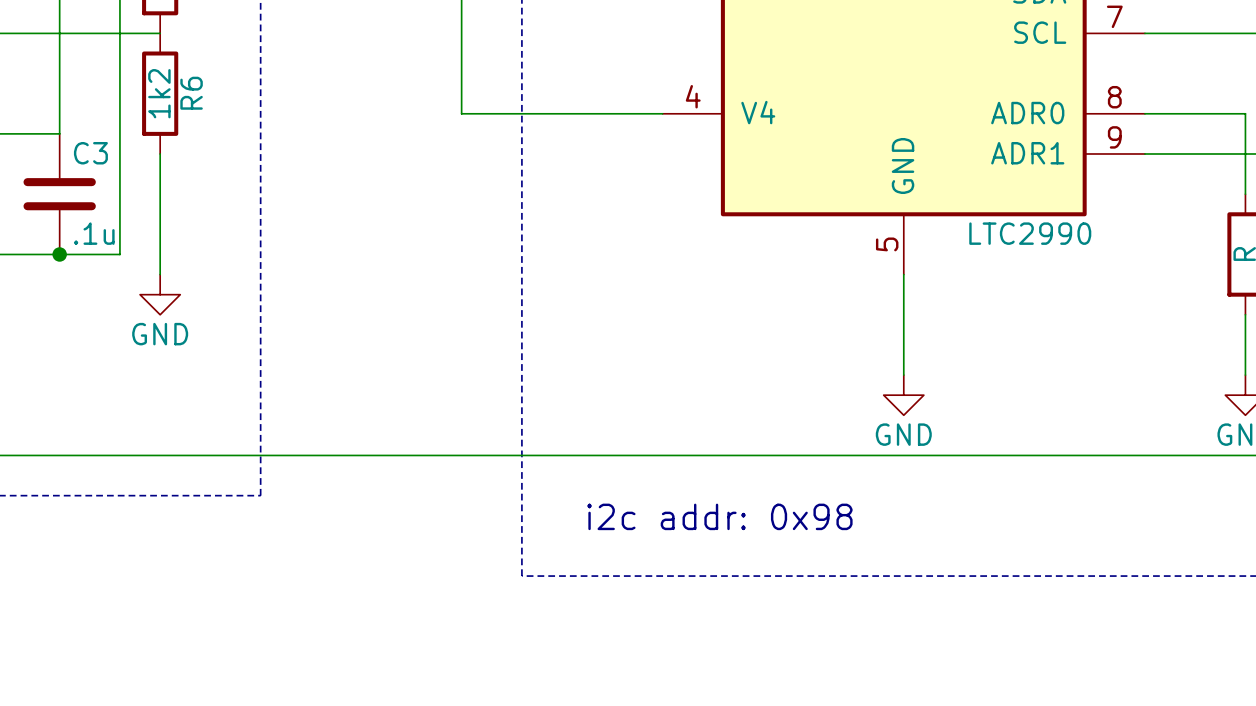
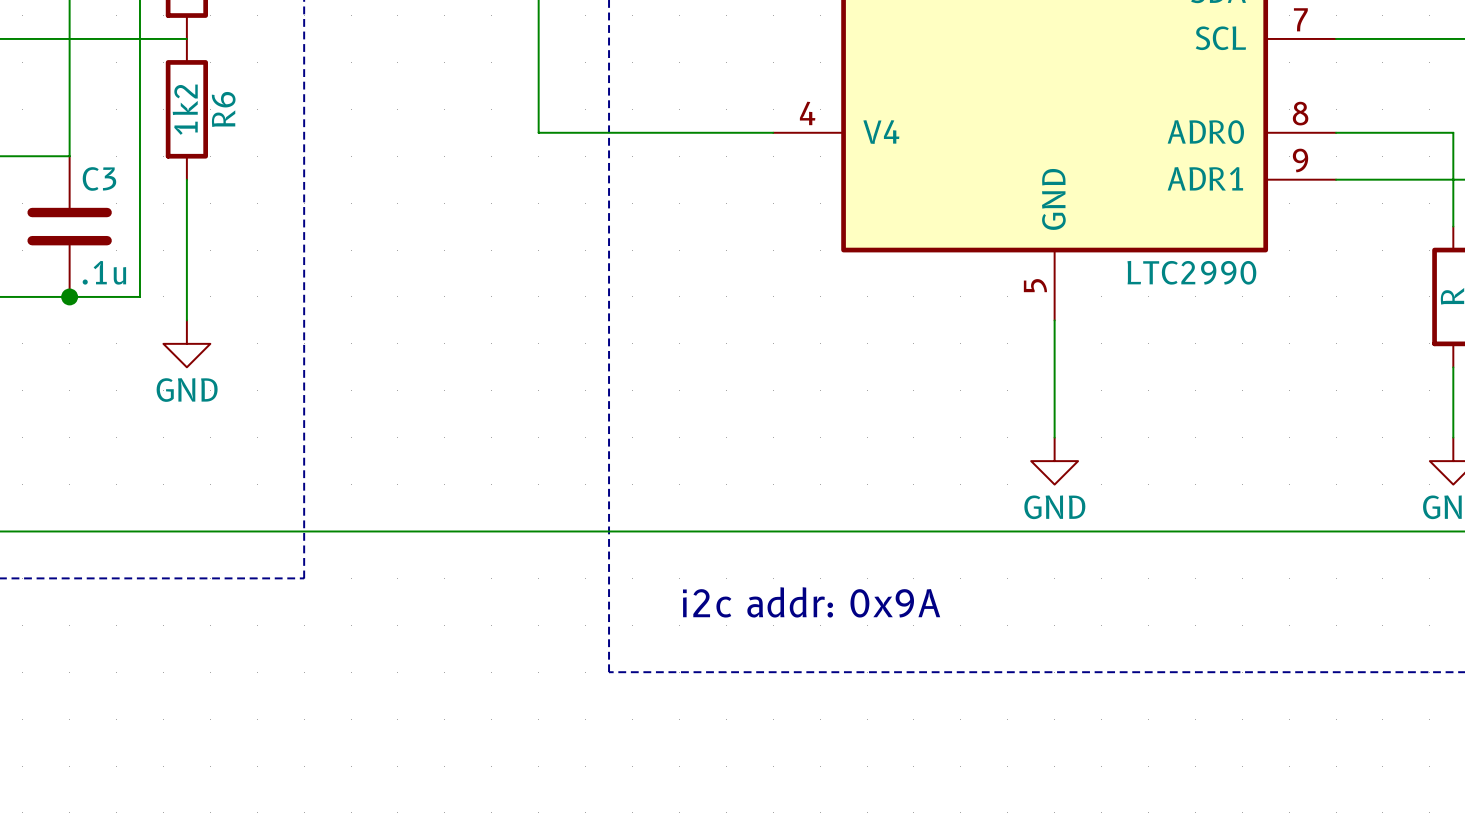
text: i2c addr: 0x98 (719, 516) -> i2c addr: 0x9A (811, 602)

